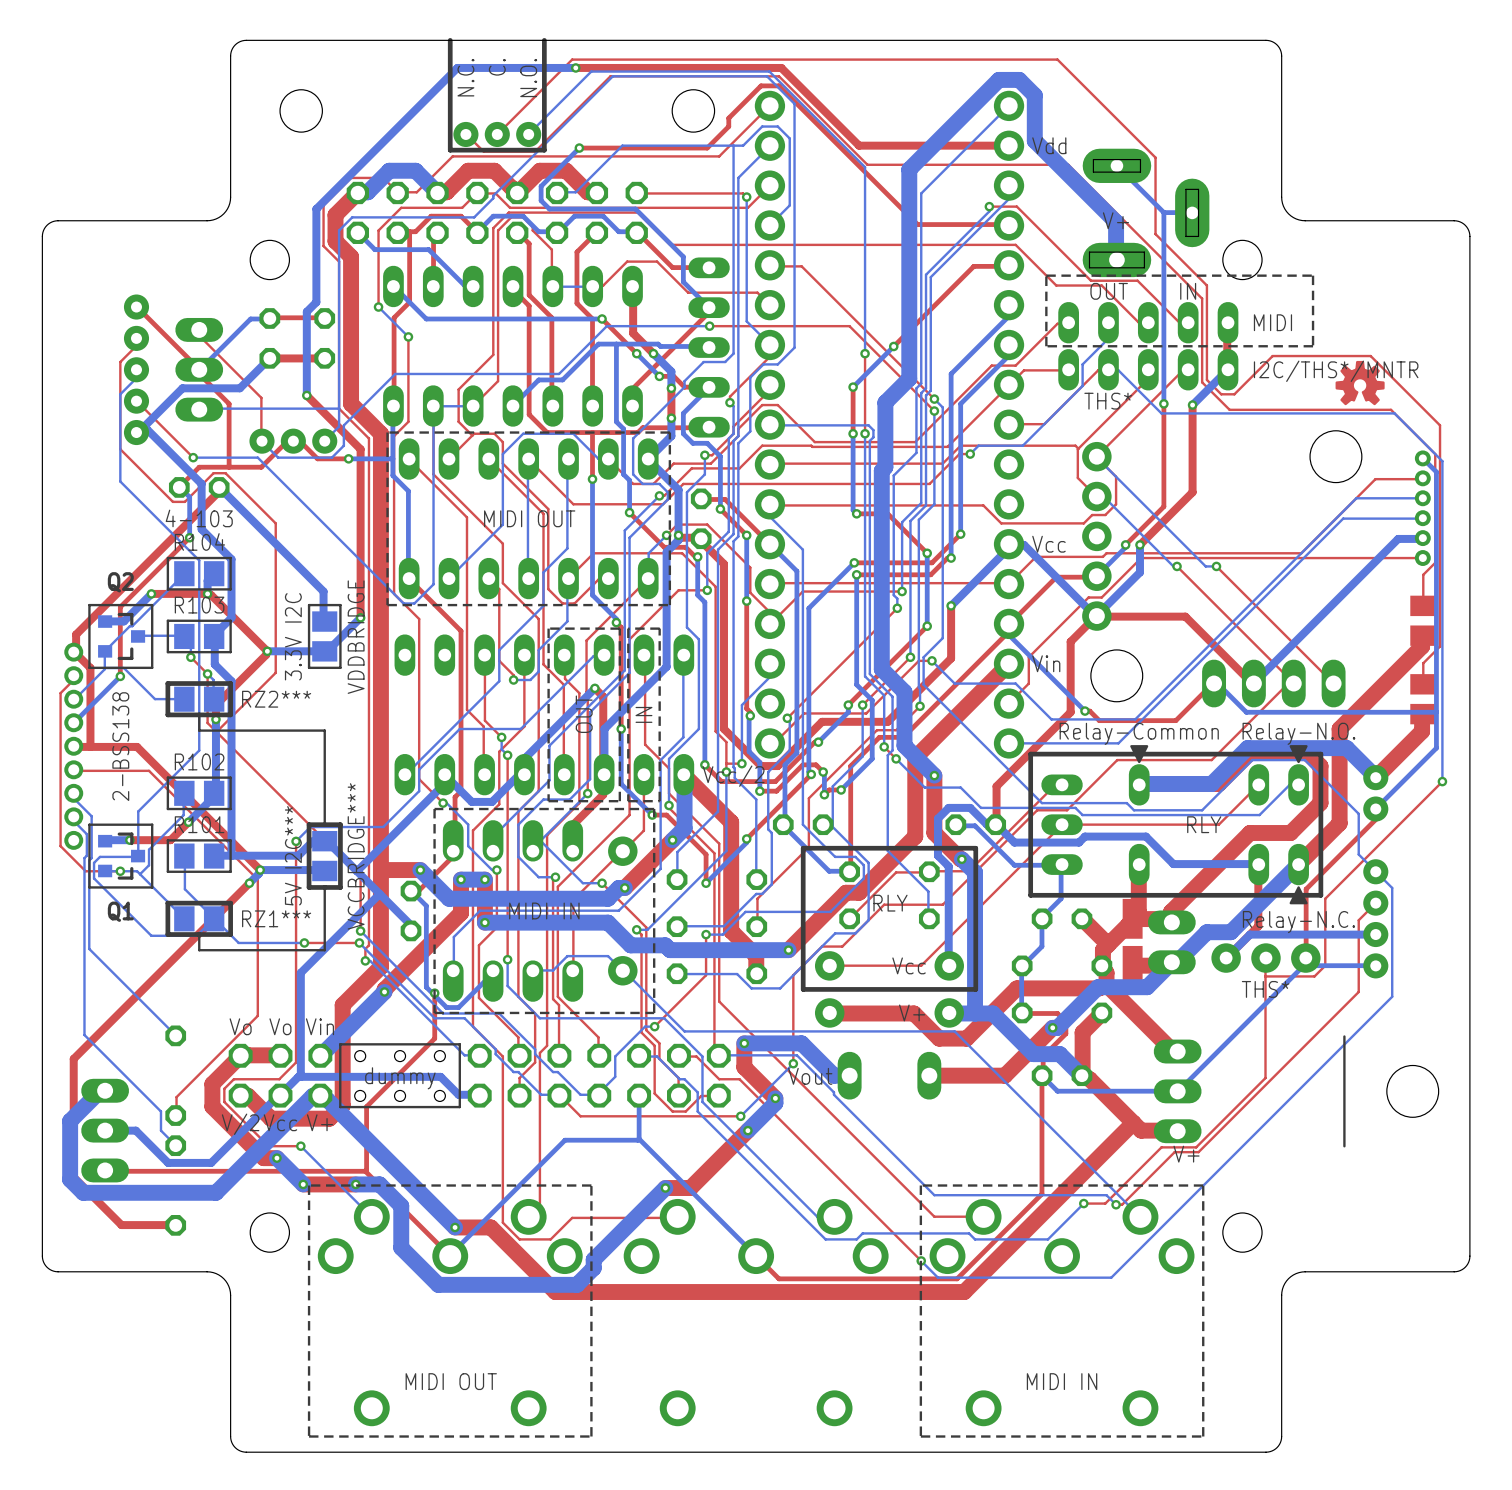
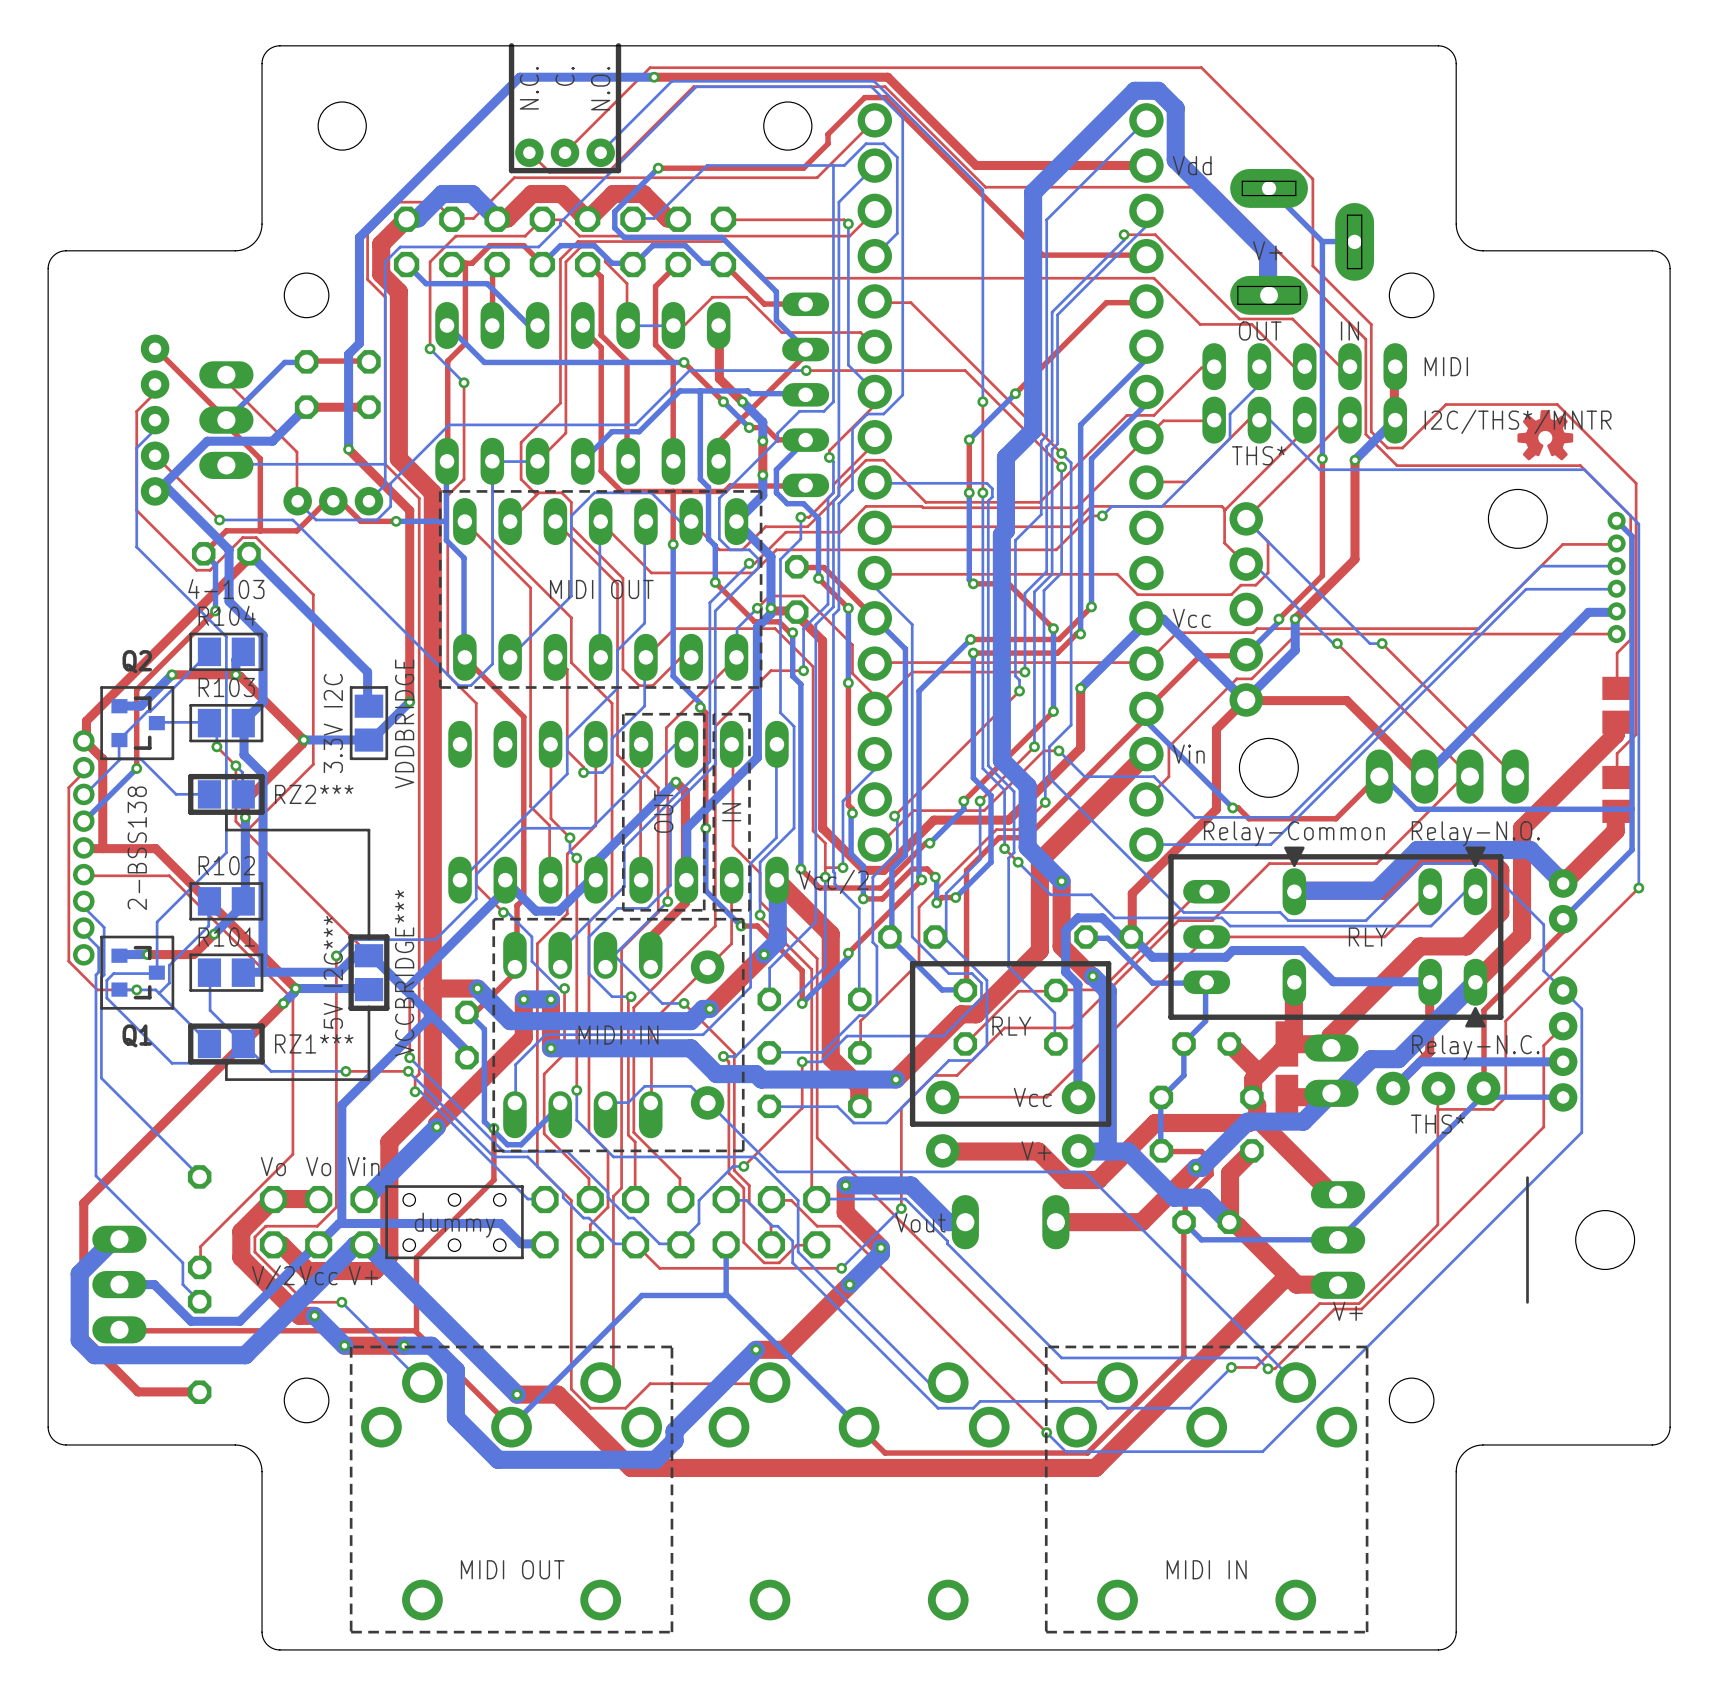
line: (1313, 275) (1046, 275) (1046, 346) (1313, 346) (1313, 275) -> none

